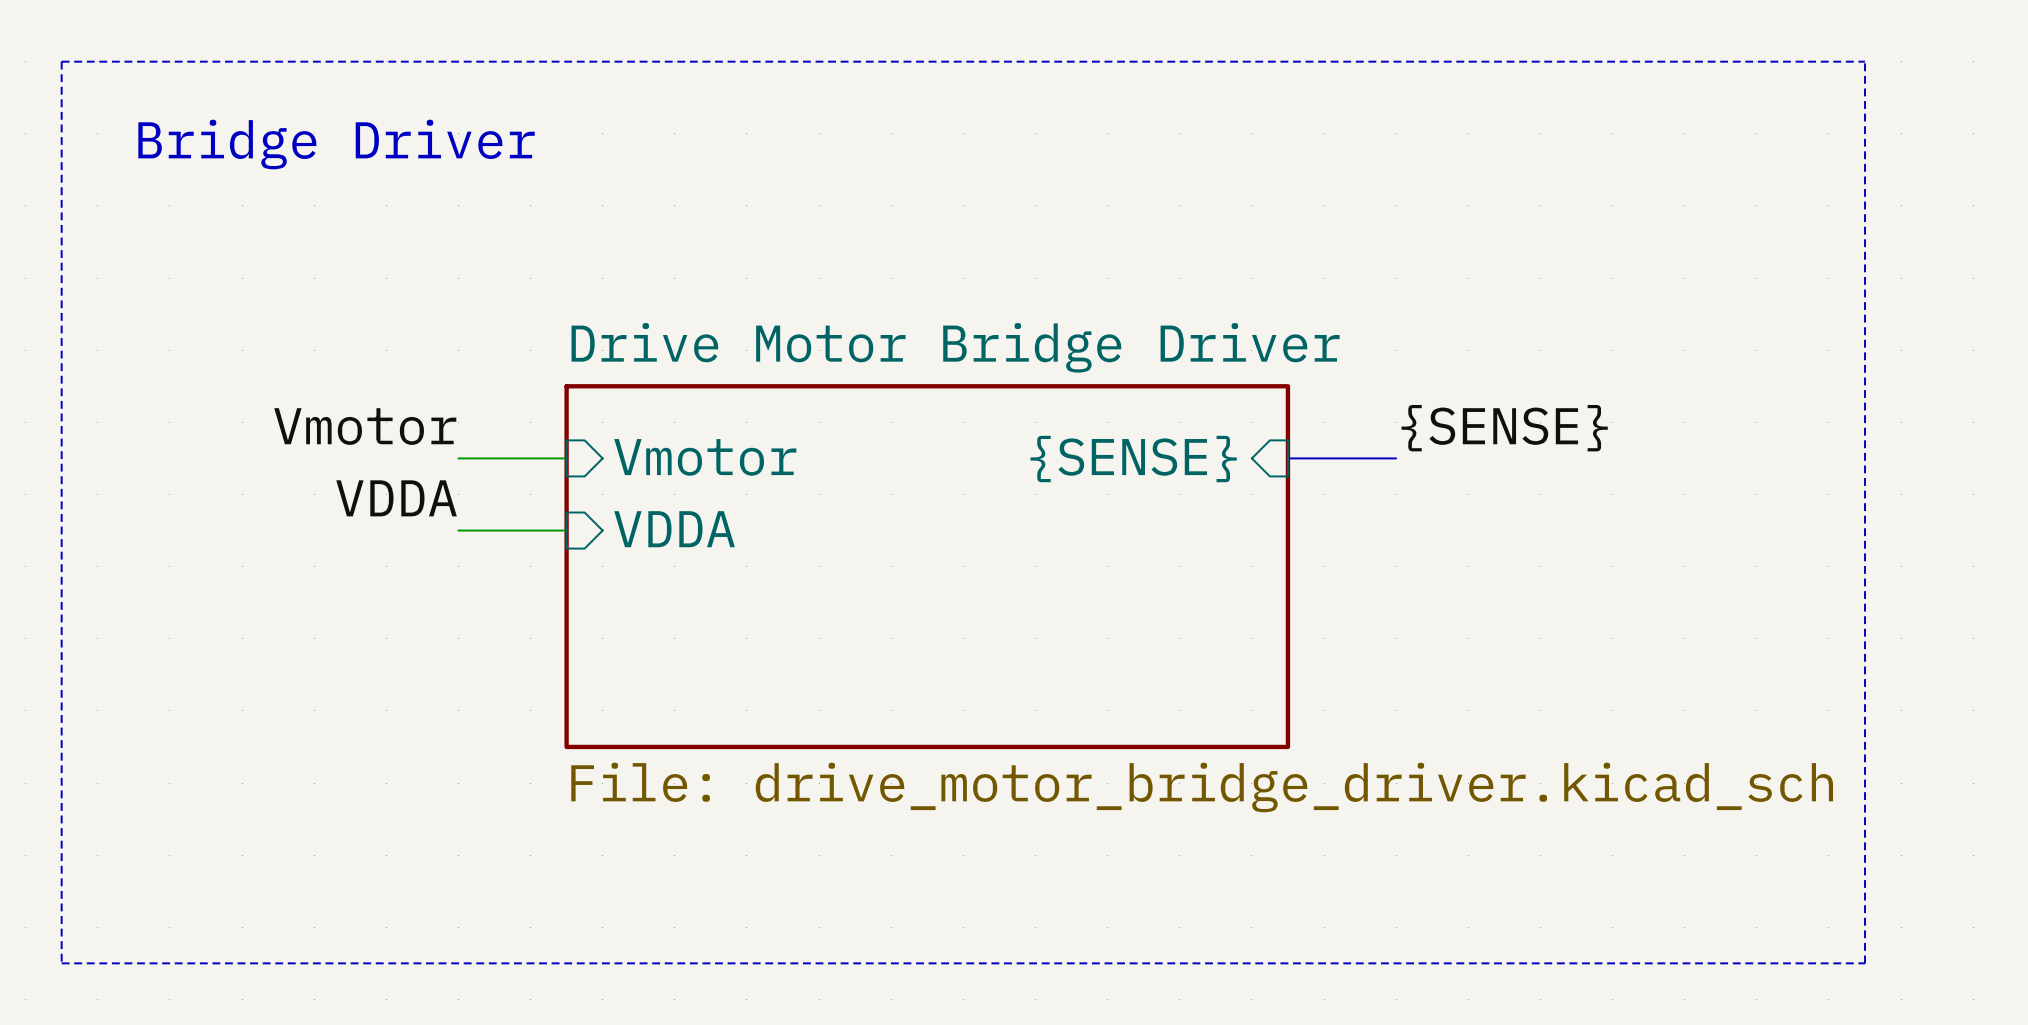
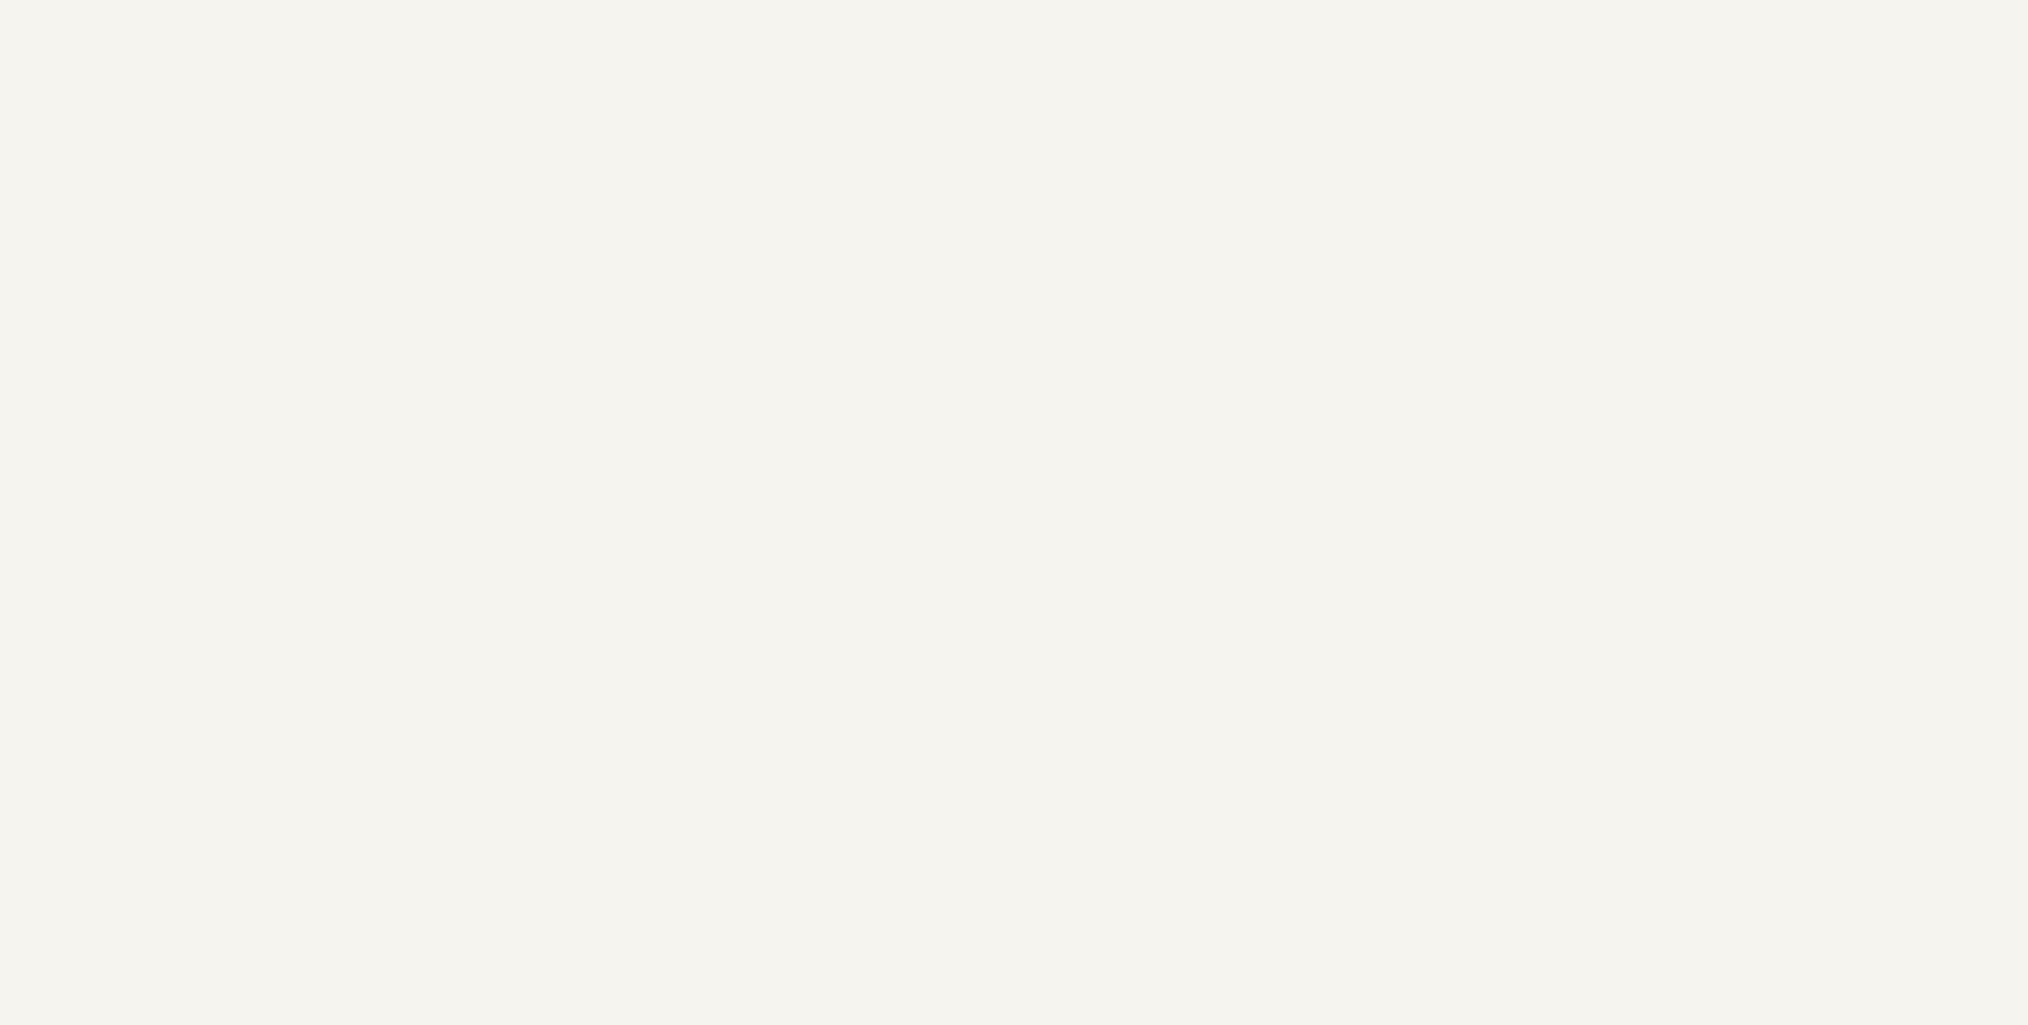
line: (61, 61) (61, 963) (1865, 963) (1865, 61) (61, 61) -> none
text: Bridge Driver (336, 144) -> none
label: Vmotor (365, 426) -> none
label: {SENSE} (1504, 428) -> none
sheet pin: Vmotor (705, 457) -> none
wire: (458, 458) (566, 458) -> none
bus: (1287, 458) (1396, 458) -> none
sheet pin: {SENSE} (1133, 459) -> none
label: VDDA (396, 498) -> none
sheet pin: VDDA (674, 529) -> none
wire: (458, 530) (566, 530) -> none
sheet Drive Motor Bridge Driver: File: drive_motor_bridge_driver.kicad_sch (927, 566) -> none

